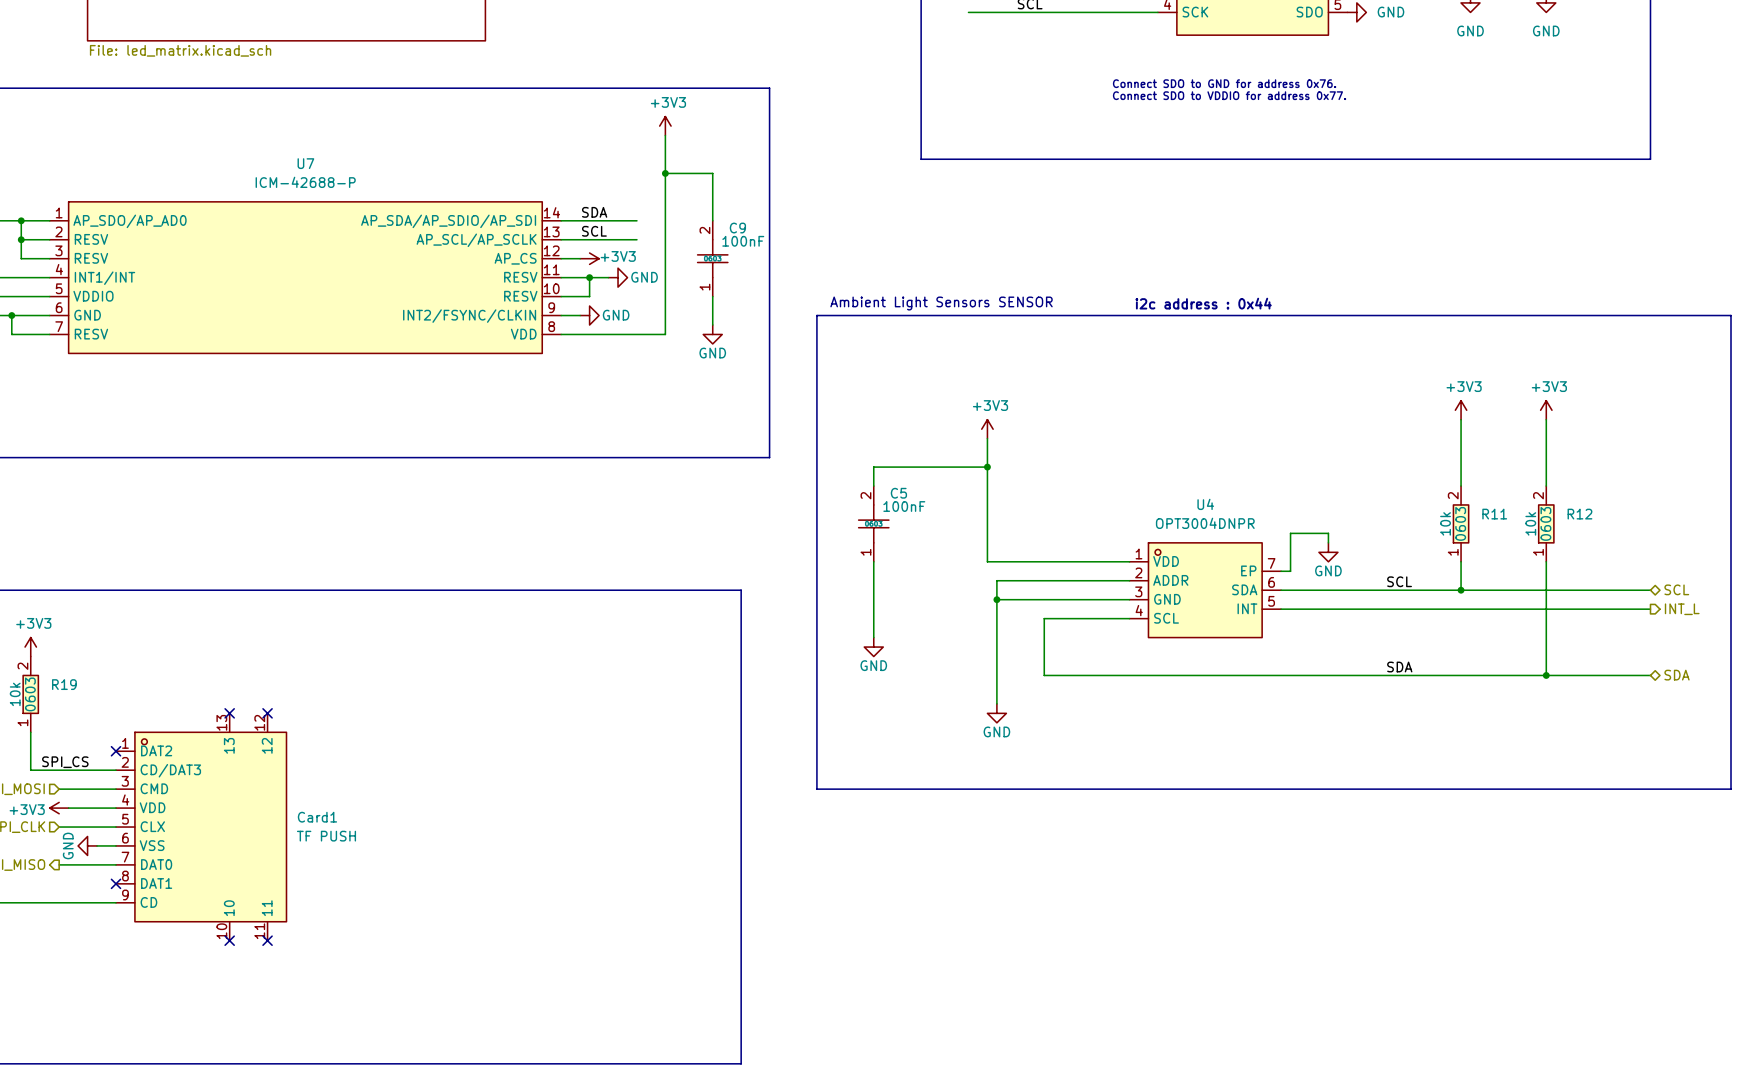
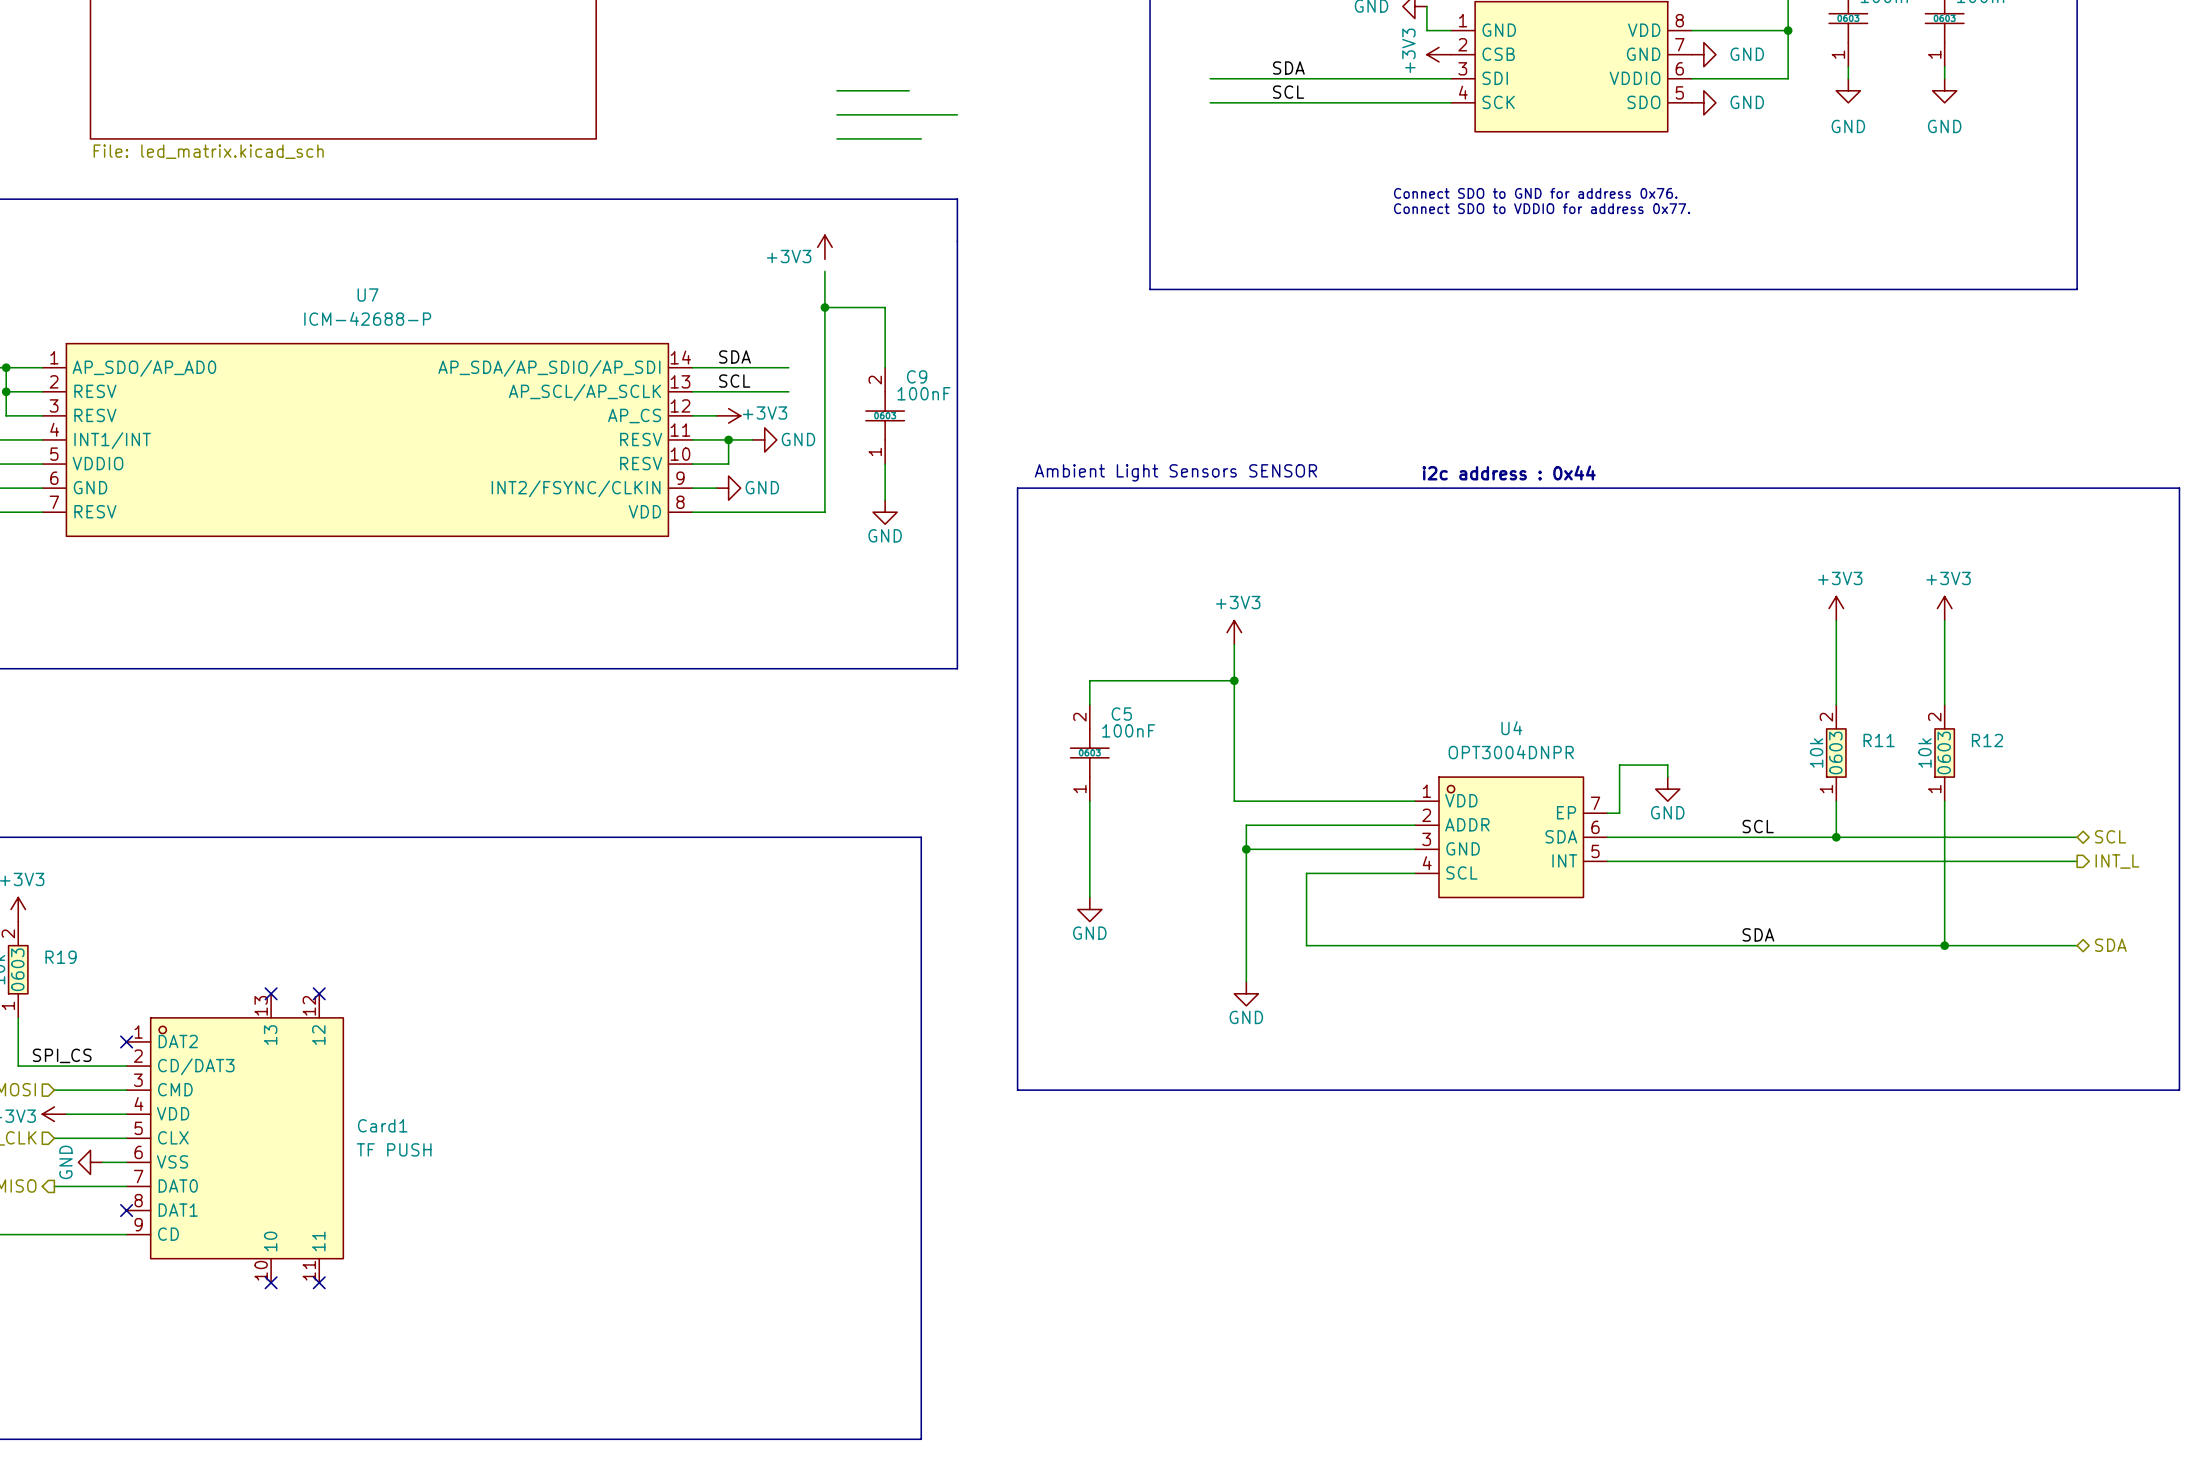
wire: none -> (836, 90) (909, 90)
wire: none -> (836, 114) (957, 114)
wire: none -> (836, 138) (921, 138)
power symbol text position: +3V3 (668, 102) -> +3V3 (789, 256)
wire: (665, 135) (665, 145) -> none

